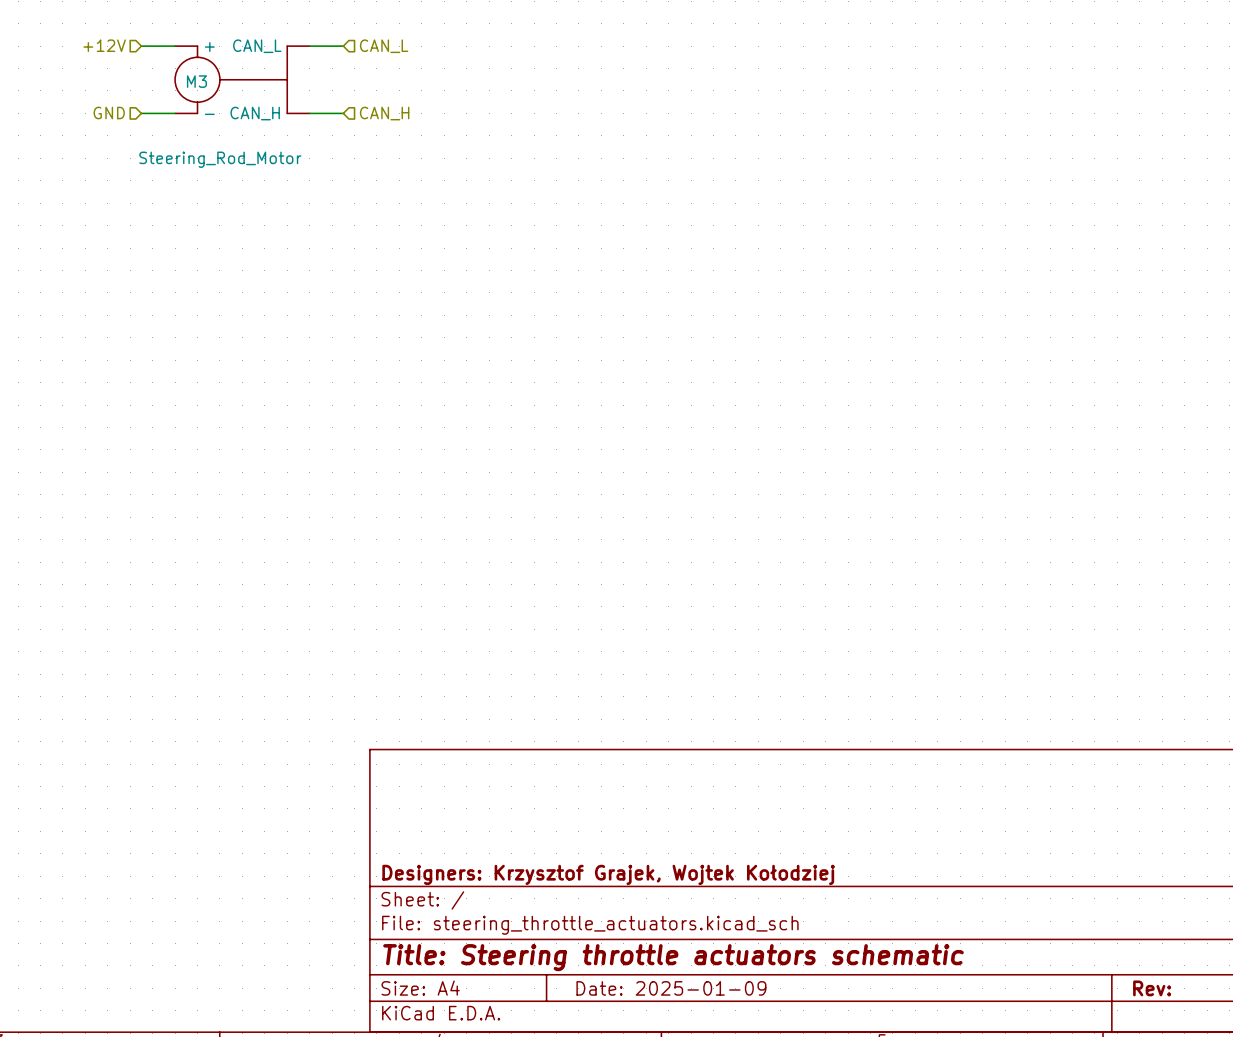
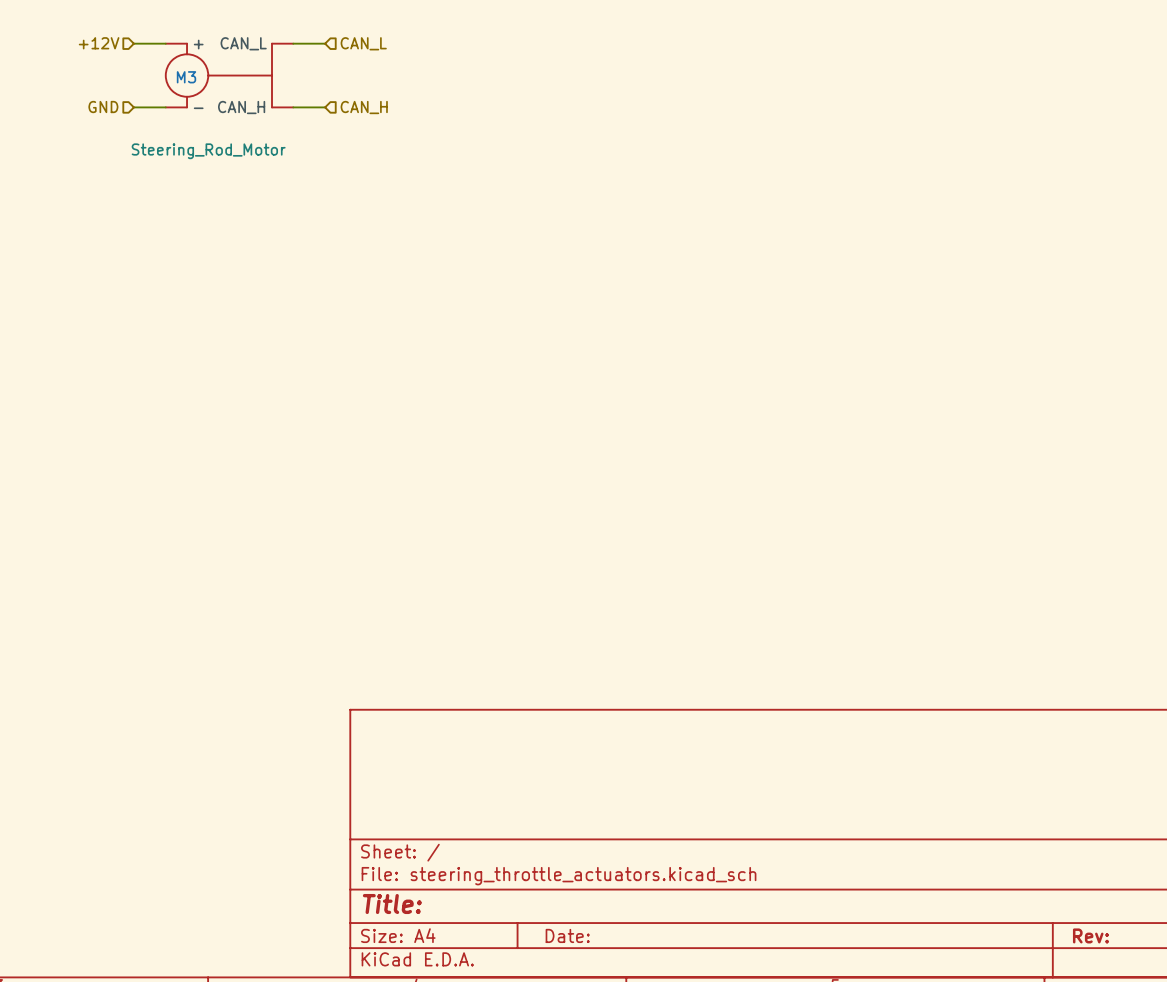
title block: Designers: Krzysztof Grajek, Wojtek Kołodziej (608, 874) -> none
title block: Title: Steering throttle actuators schematic (673, 957) -> Title: (392, 904)
title block: Date: 2025-01-09 (671, 988) -> Date: (567, 935)

